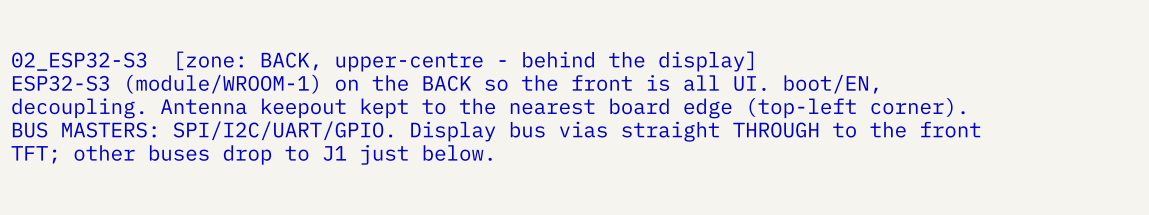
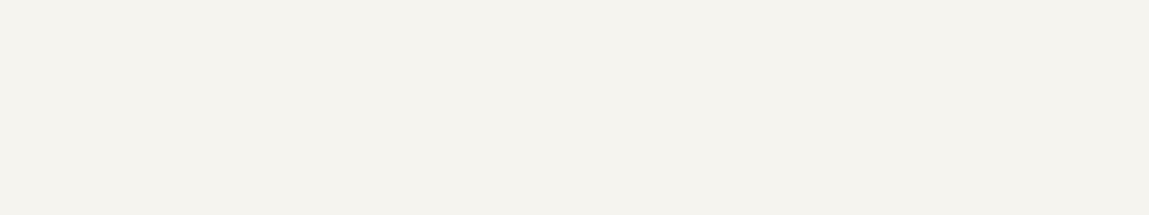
text: 02_ESP32-S3 [zone: BACK, upper-centre - behind the display] (382, 61) -> none
text: ESP32-S3 (module/WROOM-1) on the BACK so the front is all UI. boot/EN, (445, 84) -> none
text: decoupling. Antenna keepout kept to the nearest board edge (top-left corner). (488, 108) -> none
text: BUS MASTERS: SPI/I2C/UART/GPIO. Display bus vias straight THROUGH to the front (496, 131) -> none
text: TFT; other buses drop to J1 just below. (251, 154) -> none

